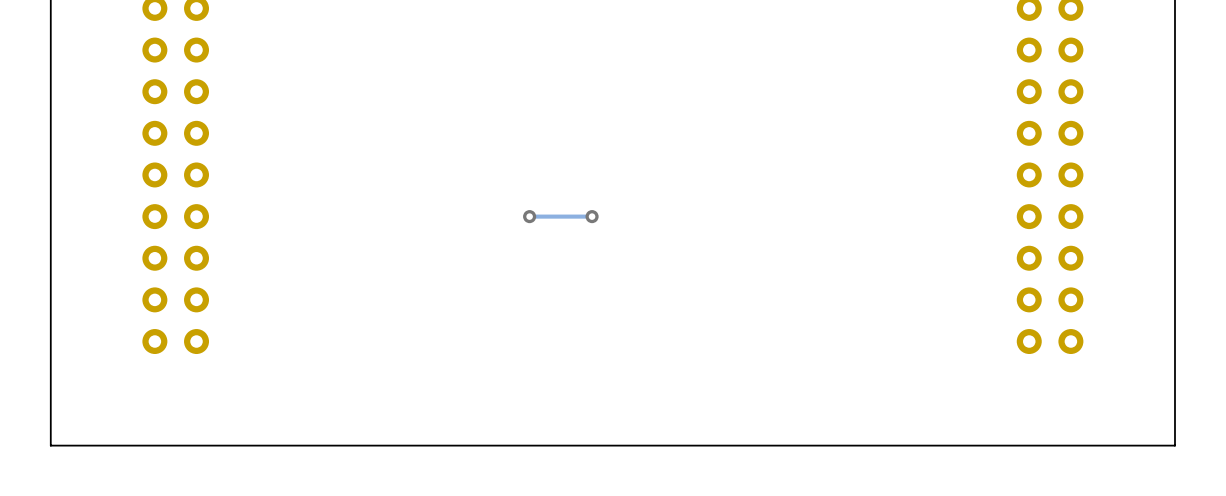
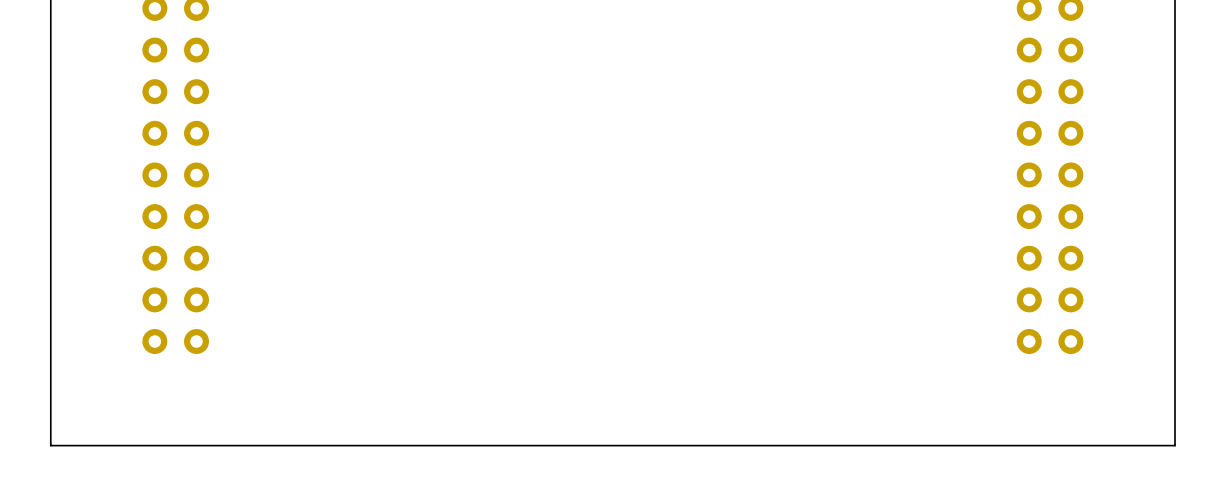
via: (529, 216) -> none
track: (592, 216) (529, 216) -> none
via: (592, 216) -> none

